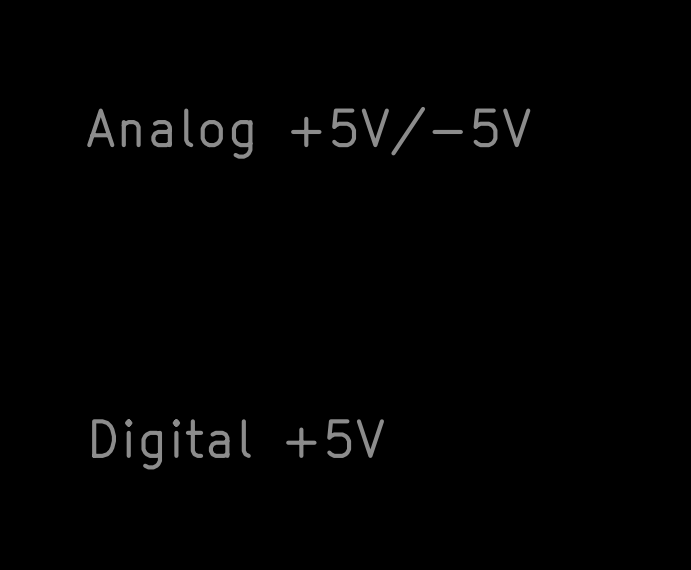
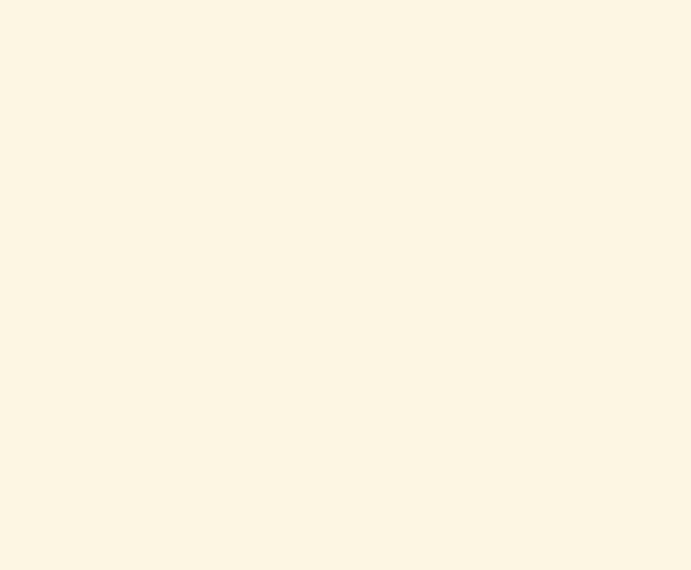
text: Analog +5V/-5V (308, 132) -> none
text: Digital +5V (238, 444) -> none

